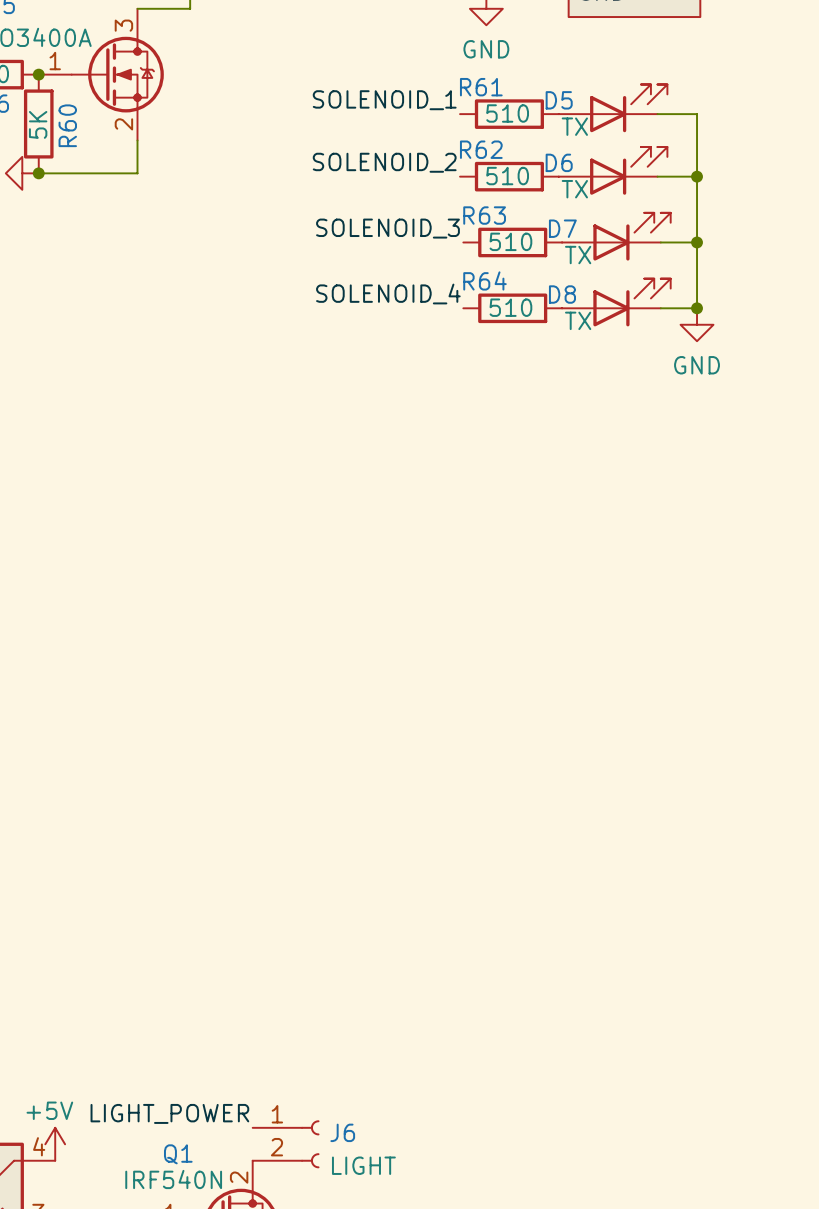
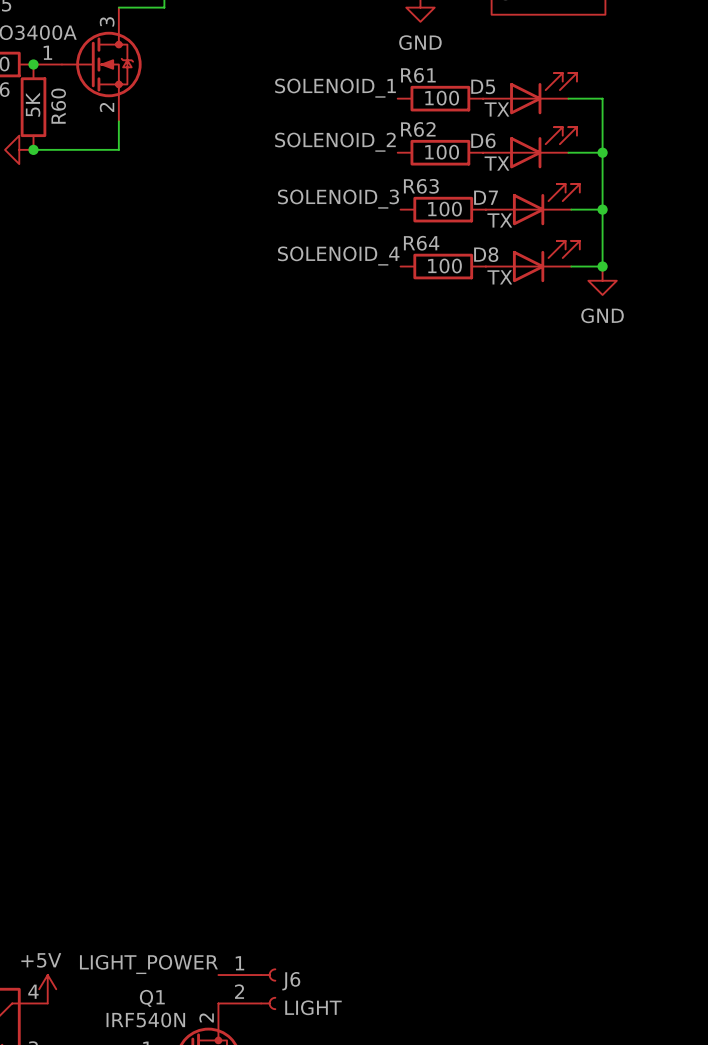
R61 value: 510 (507, 113) -> 100 (442, 98)
R62 value: 510 (507, 176) -> 100 (442, 152)
R63 value: 510 (510, 241) -> 100 (444, 209)
R64 value: 510 (510, 307) -> 100 (444, 266)

